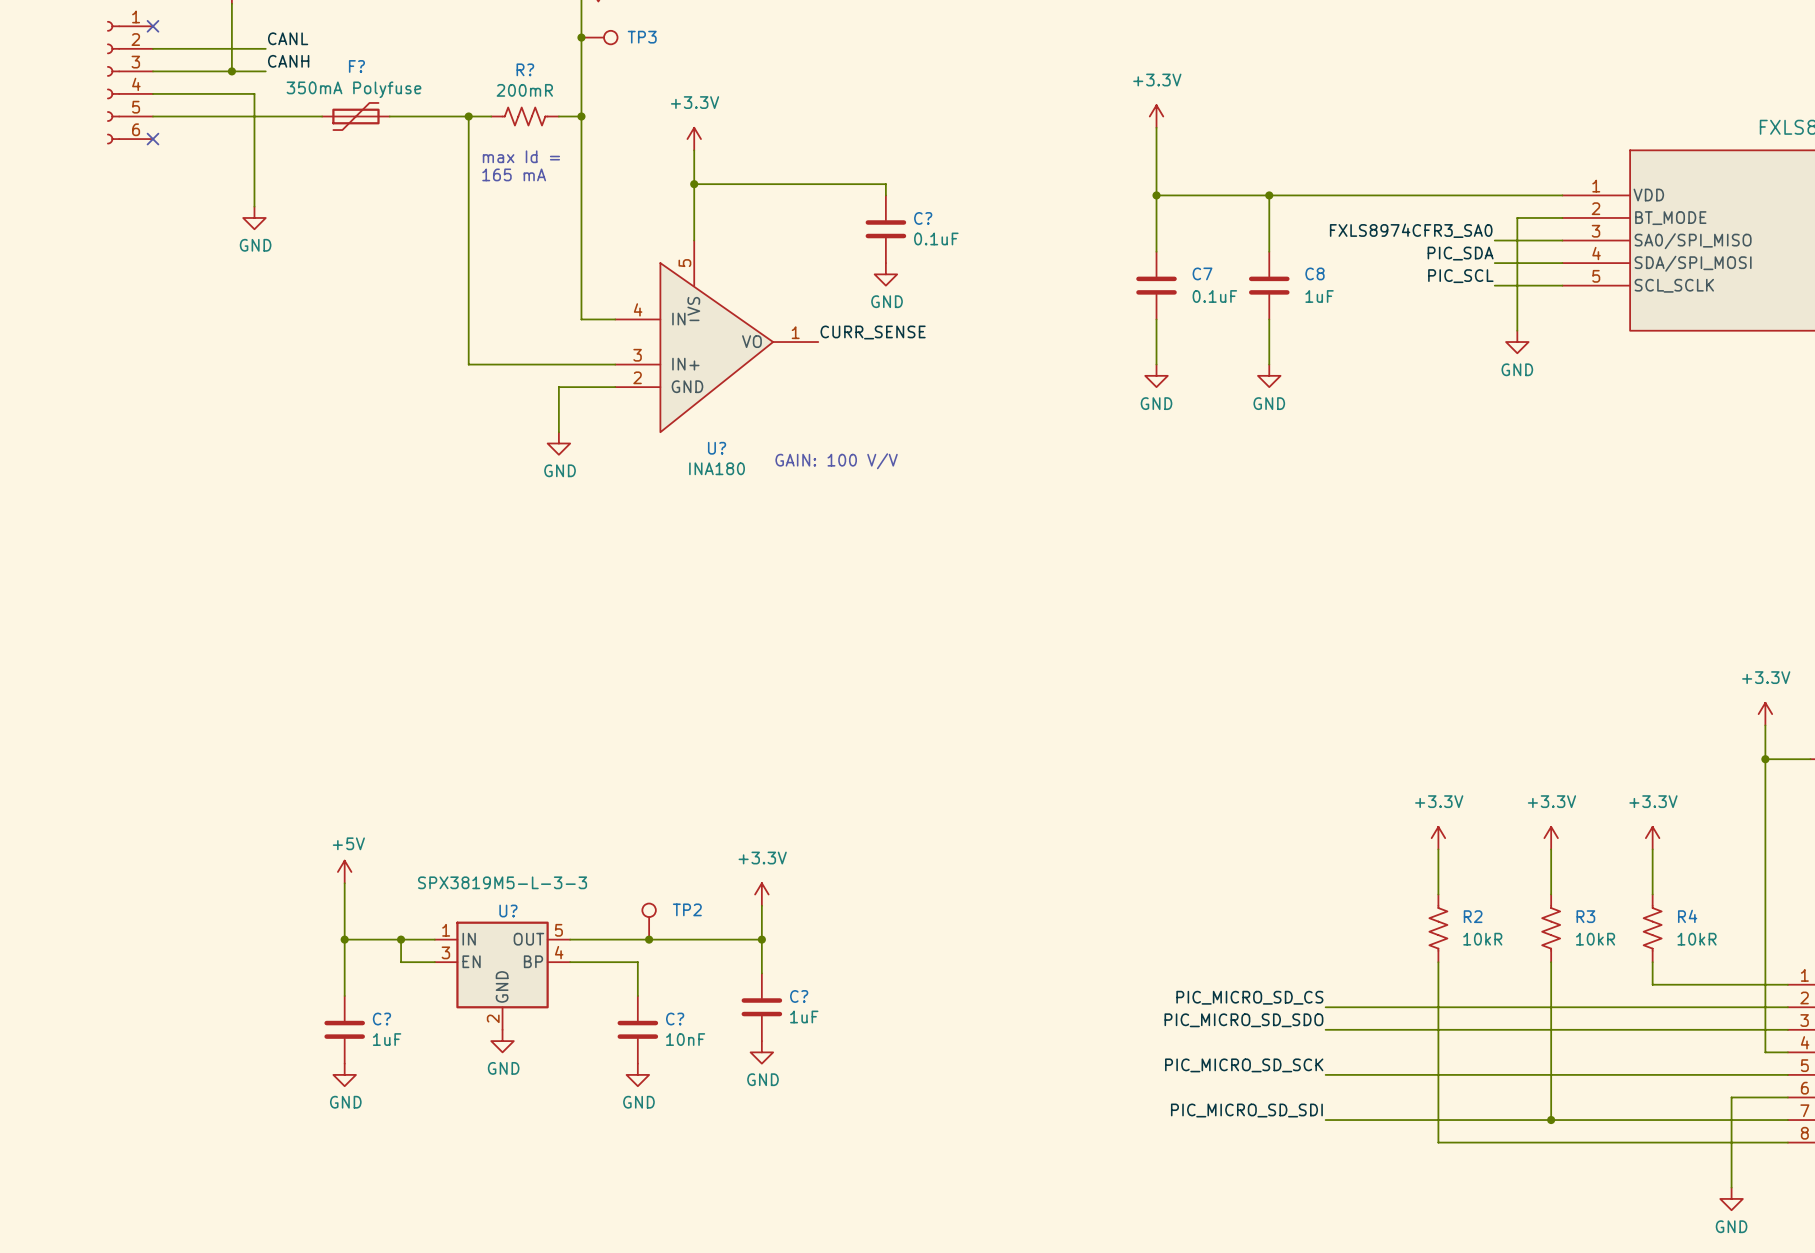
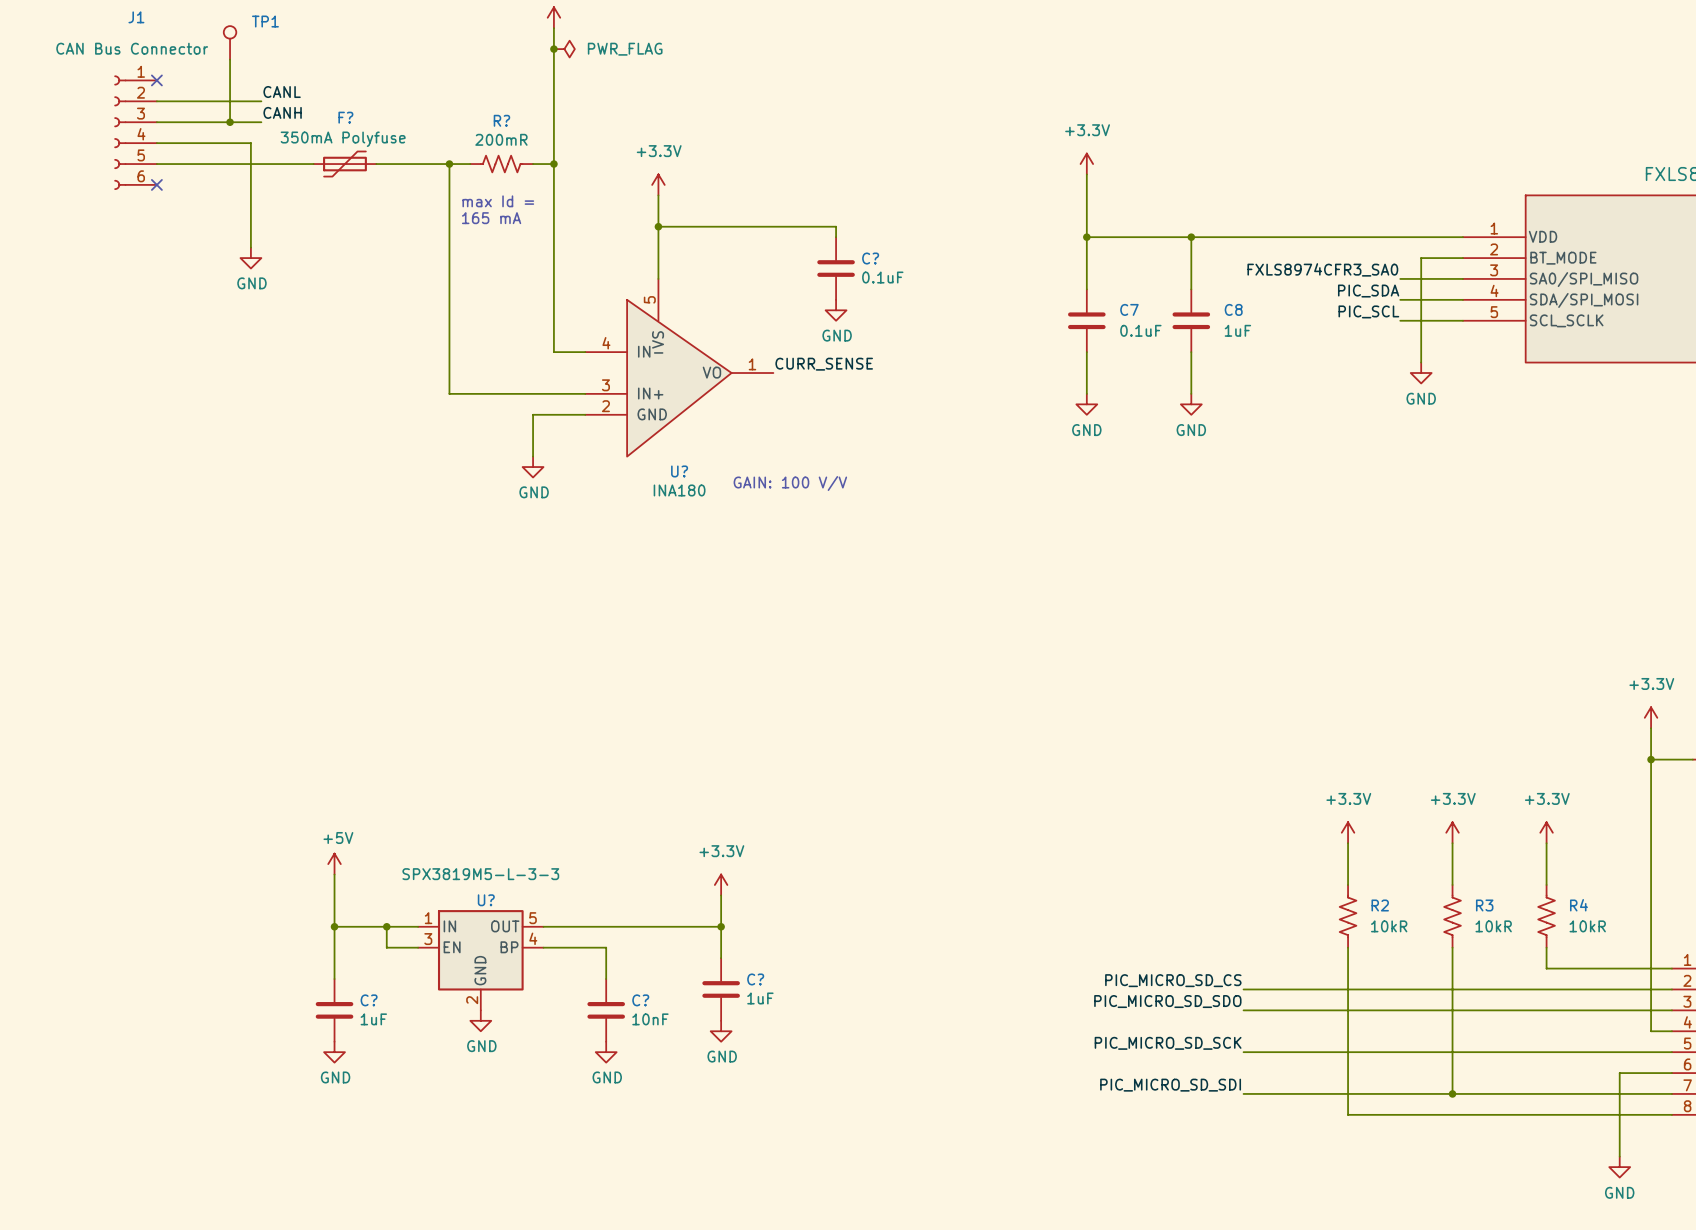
junction: (581, 37) -> none
TP3: (599, 37) -> none
TP2: (649, 921) -> none
junction: (649, 939) -> none

